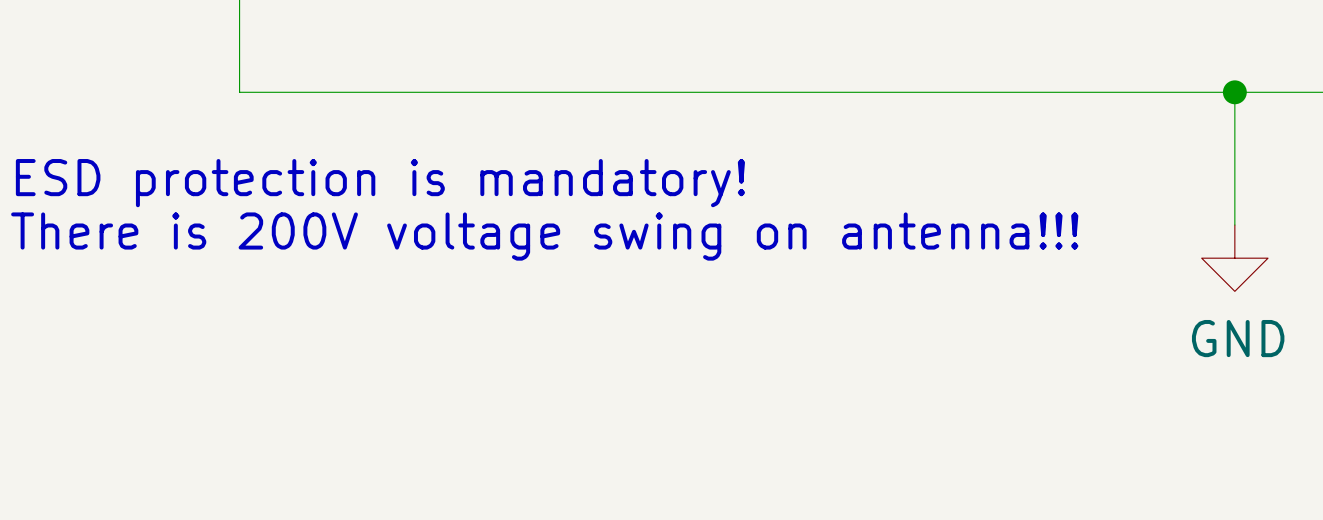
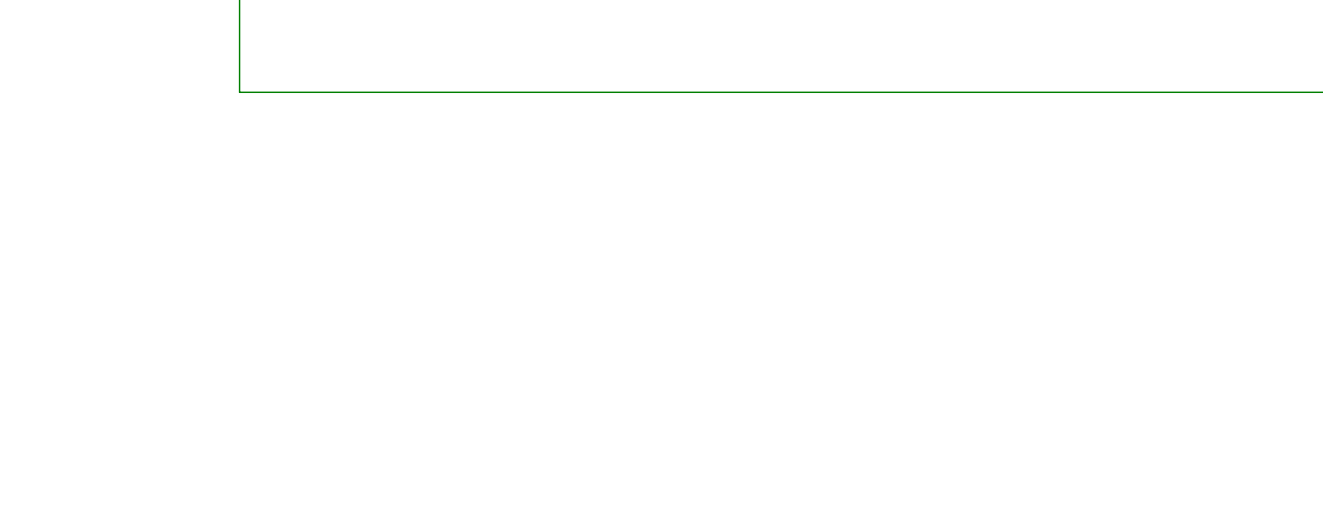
wire: (1234, 92) (1234, 225) -> none
junction: (1234, 92) -> none
text: ESD protection is mandatory! (380, 183) -> none
text: There is 200V voltage swing on antenna!!! (544, 236) -> none
power symbol: GND (1234, 258) -> none

